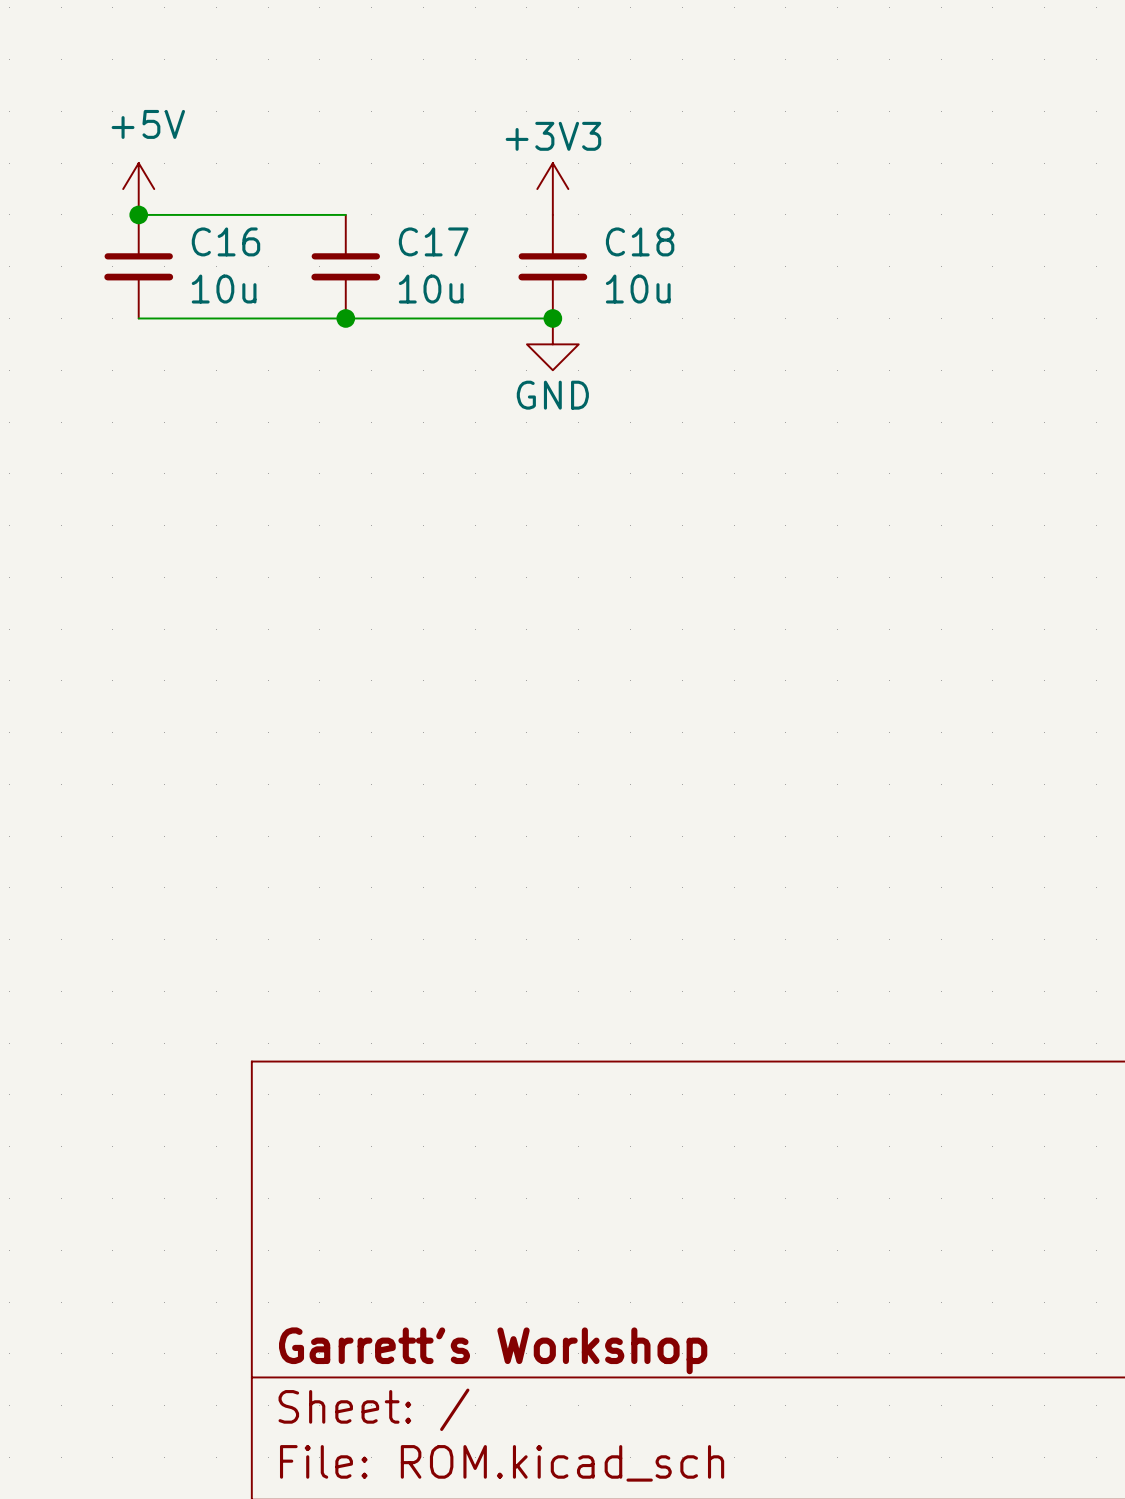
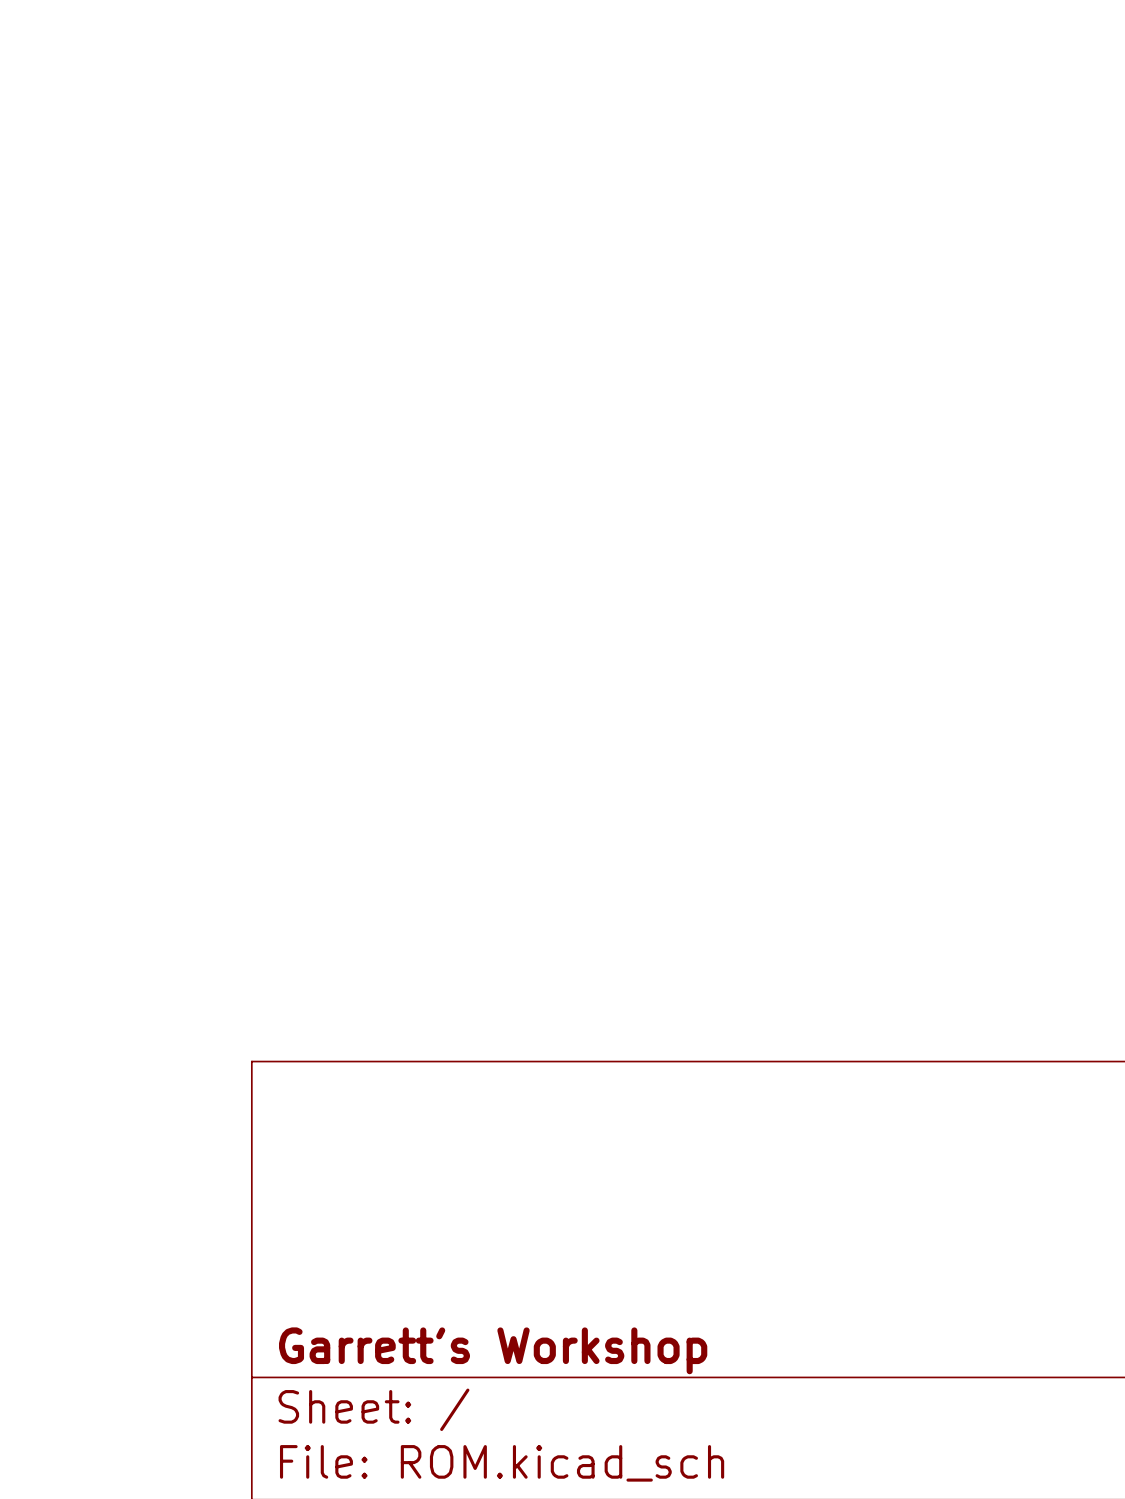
power symbol: +5V (138, 189) -> none
power symbol: +3V3 (552, 189) -> none
wire: (138, 214) (345, 214) -> none
junction: (138, 214) -> none
C16: 10u (138, 266) -> none
C17: 10u (345, 266) -> none
C18: 10u (552, 266) -> none
wire: (138, 318) (552, 318) -> none
junction: (345, 318) -> none
junction: (552, 318) -> none
power symbol: GND (552, 344) -> none

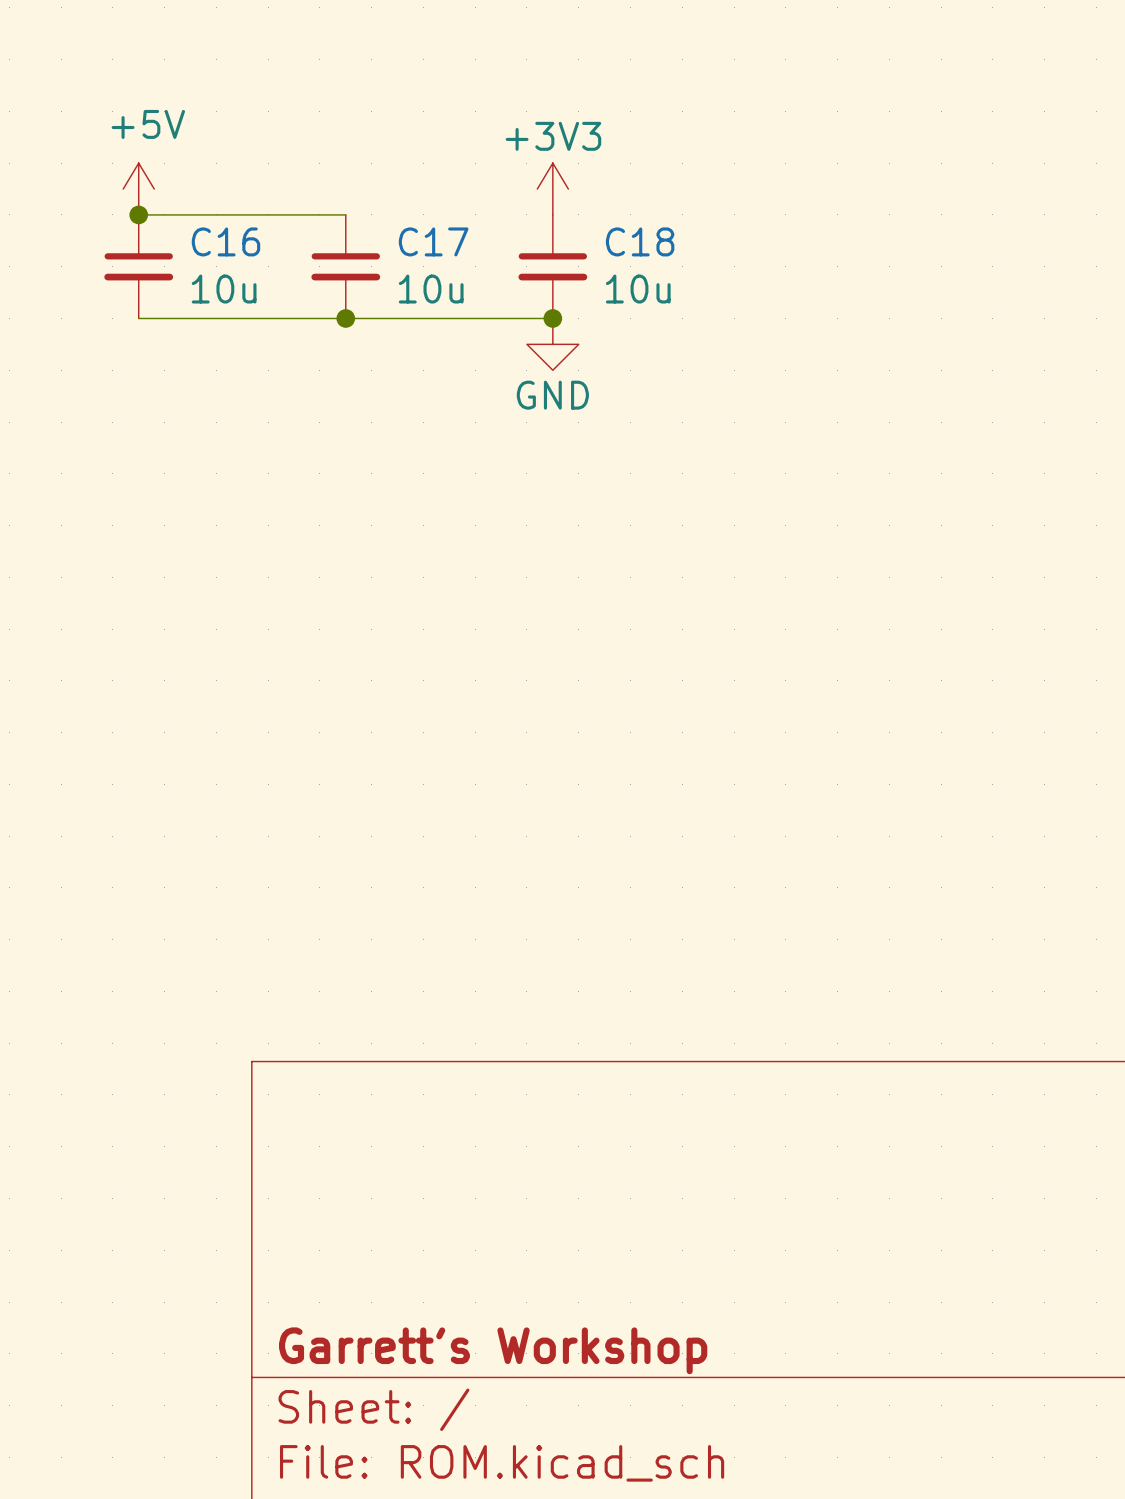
power symbol: none -> +5V (138, 189)
power symbol: none -> +3V3 (552, 189)
wire: none -> (138, 214) (345, 214)
junction: none -> (138, 214)
C16: none -> 10u (138, 266)
C17: none -> 10u (345, 266)
C18: none -> 10u (552, 266)
wire: none -> (138, 318) (552, 318)
junction: none -> (345, 318)
junction: none -> (552, 318)
power symbol: none -> GND (552, 344)

